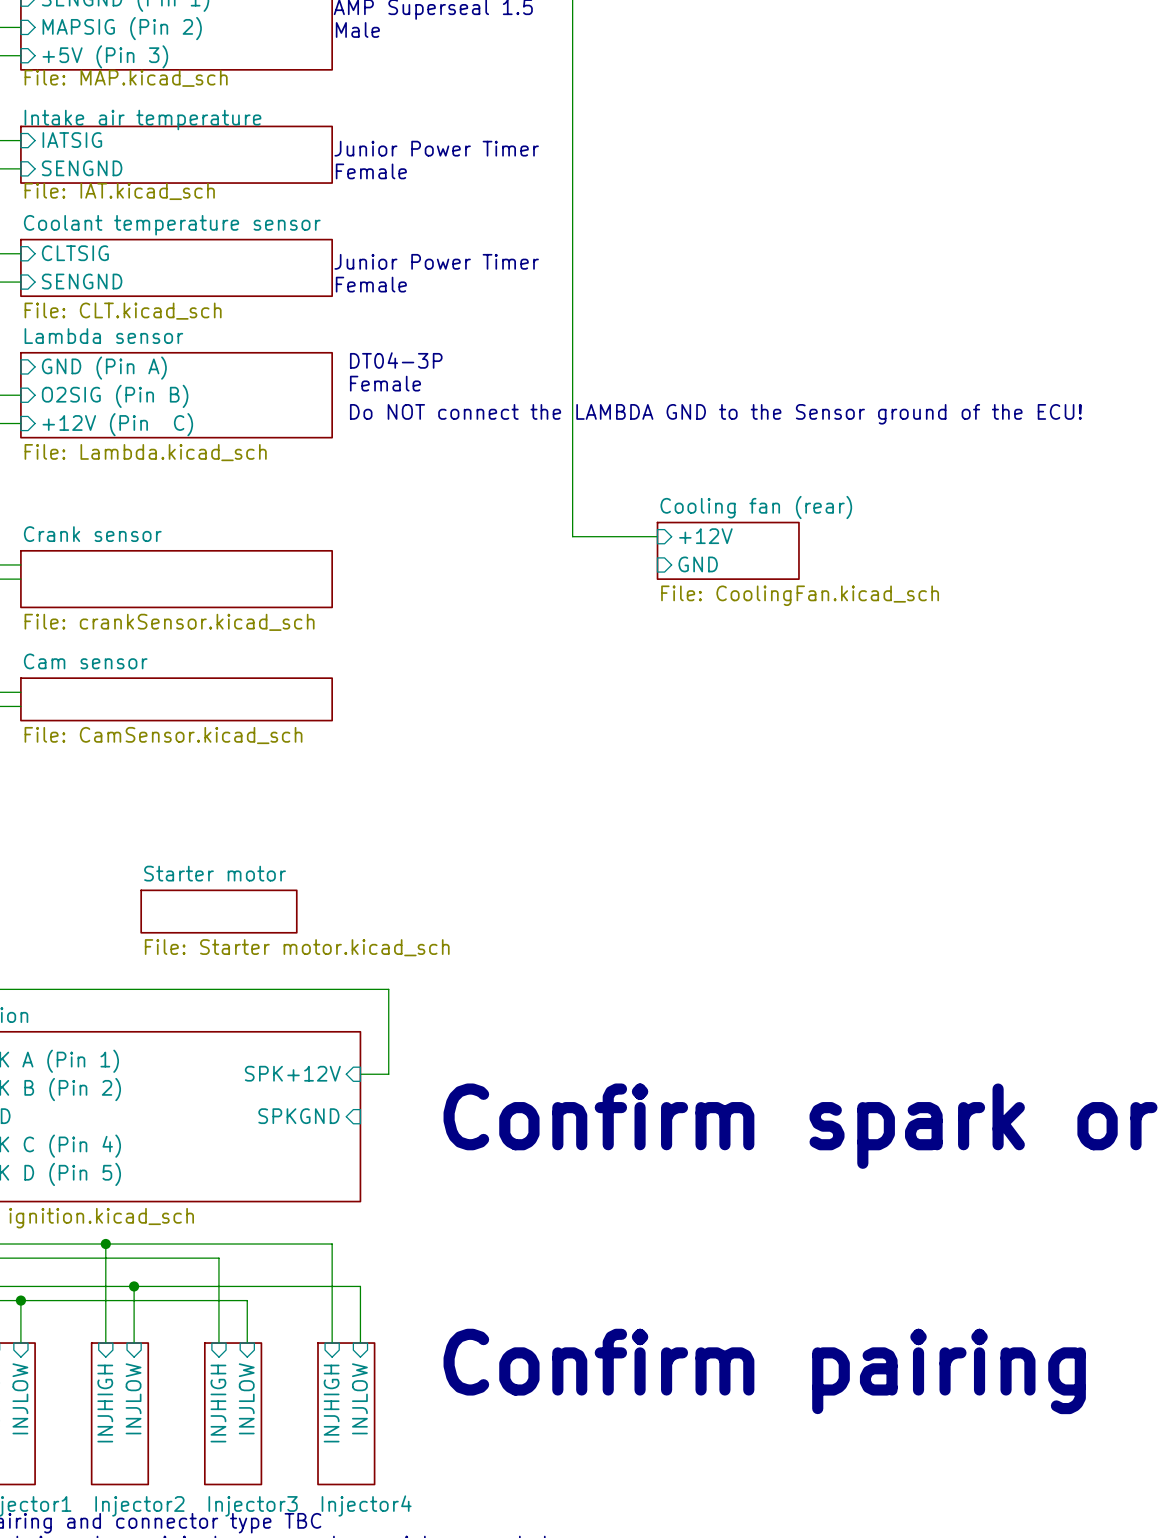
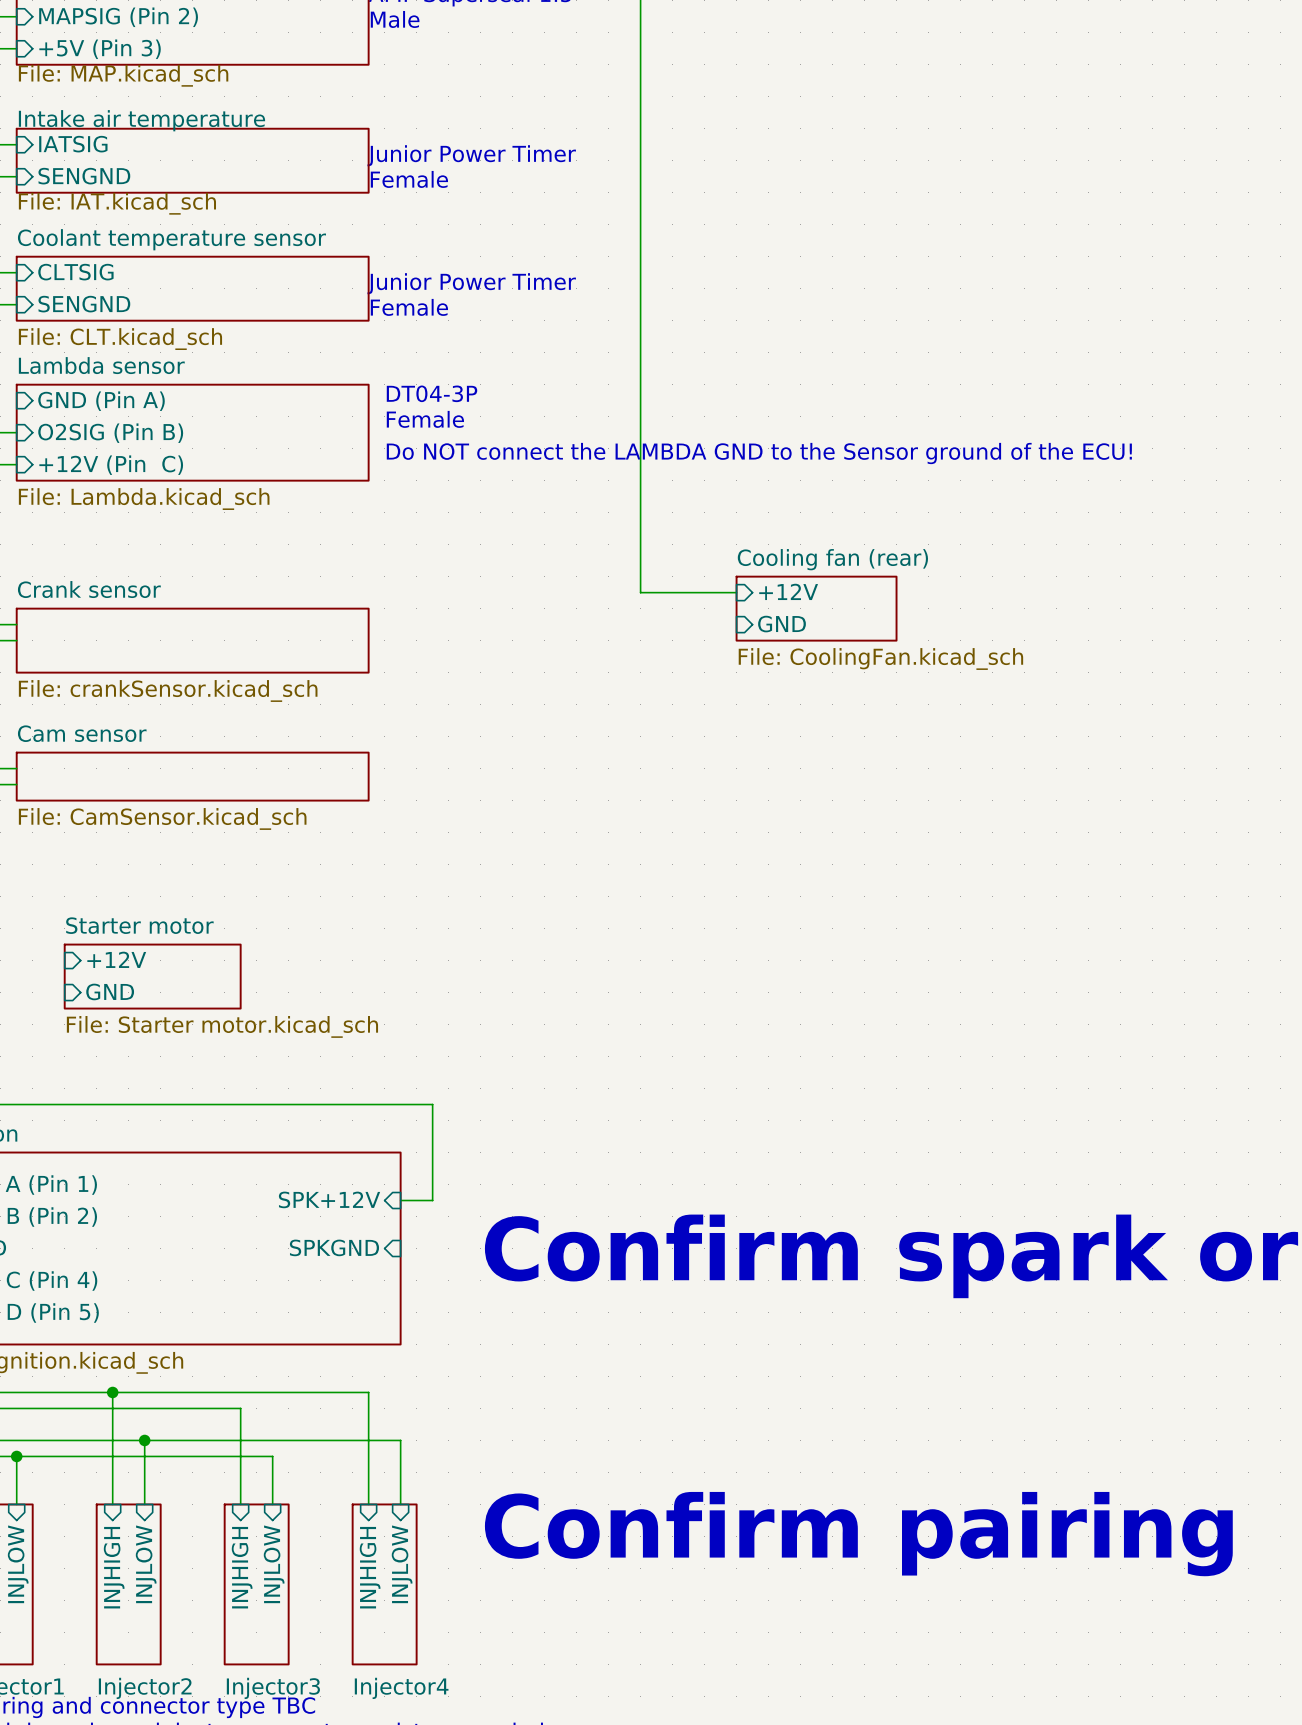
sheet pin: none -> +12V (116, 959)
sheet Starter motor: none -> File: Starter motor.kicad_sch (152, 976)
sheet pin: none -> GND (110, 991)
sheet Starter motor: File: Starter motor.kicad_sch (218, 911) -> none

